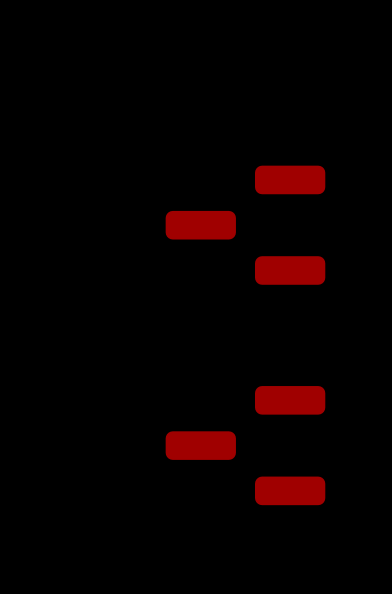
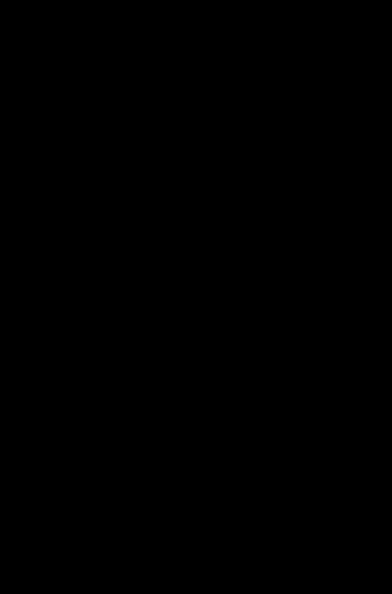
part: (245, 225) -> none
part: (245, 445) -> none

